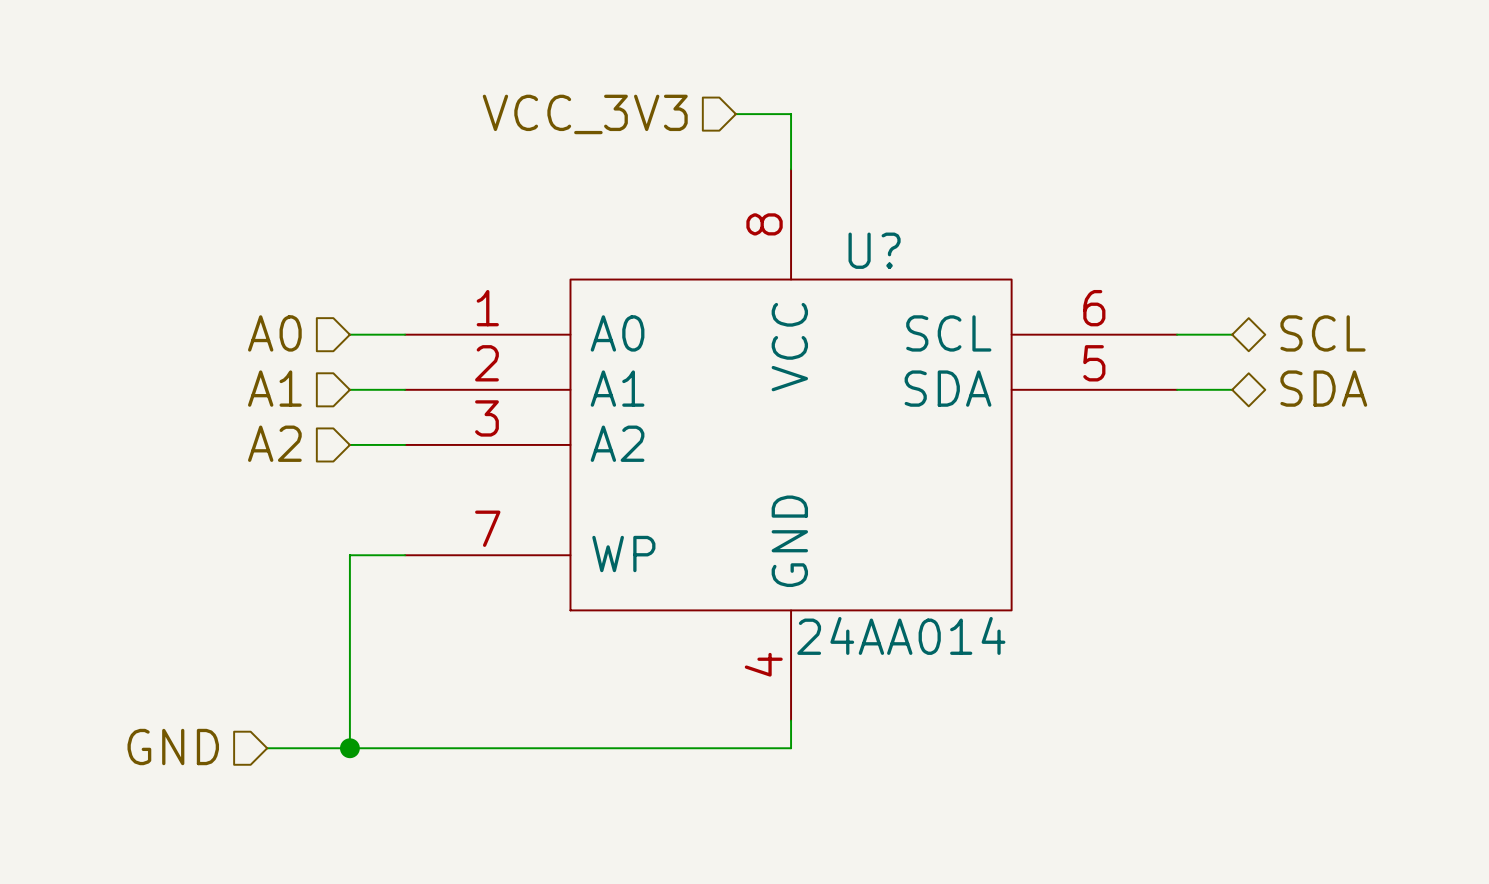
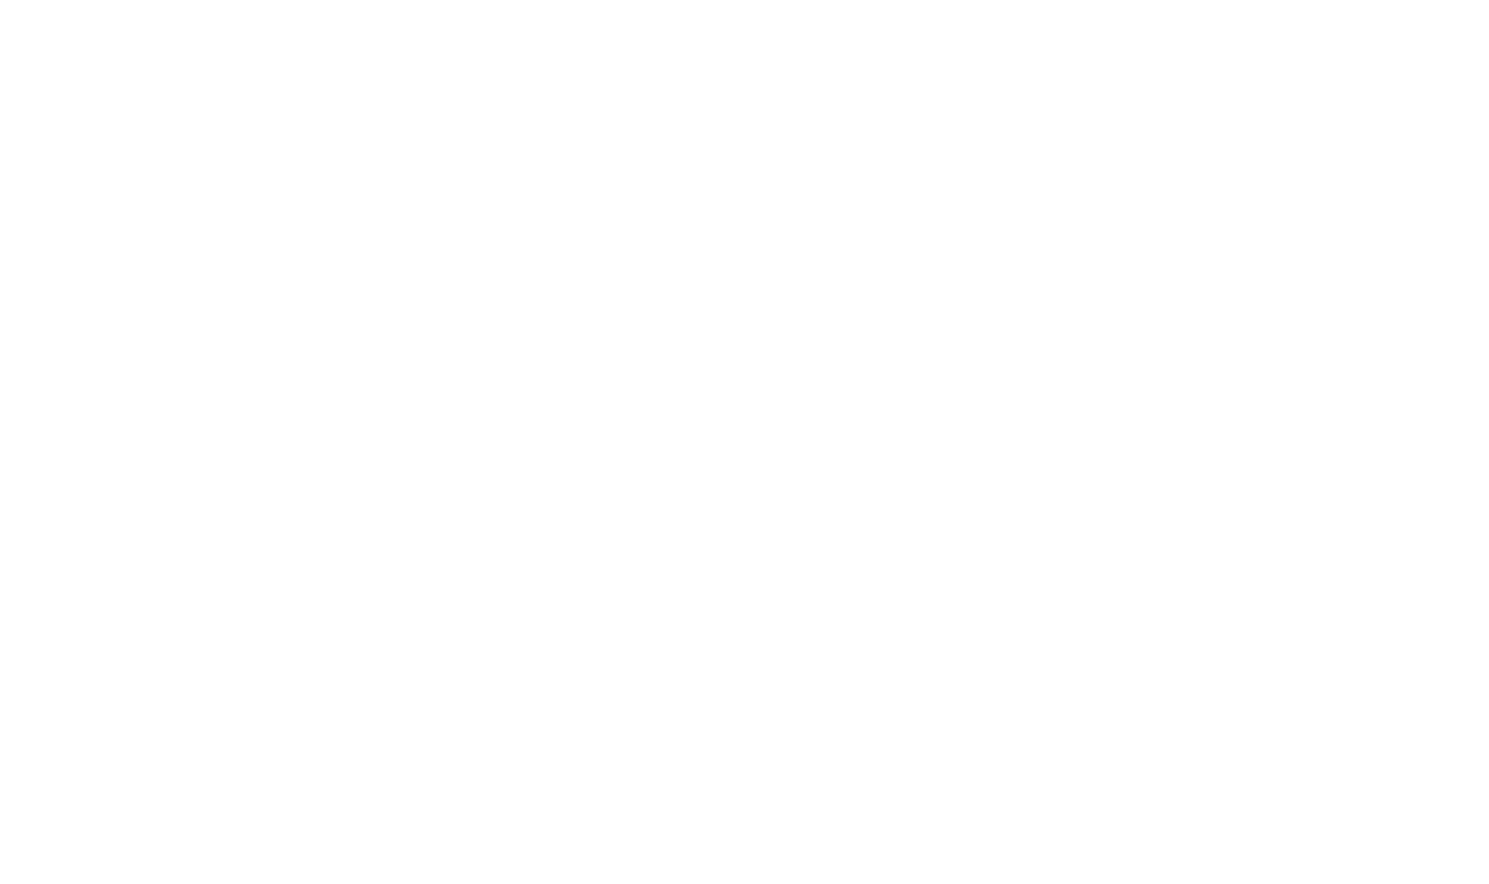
hierarchical label: VCC_3V3 (585, 114) -> none
wire: (735, 114) (791, 114) (791, 169) -> none
hierarchical label: A0 (274, 333) -> none
hierarchical label: SCL (1323, 333) -> none
wire: (349, 334) (405, 334) -> none
wire: (1177, 334) (1232, 334) -> none
hierarchical label: A1 (274, 388) -> none
hierarchical label: SDA (1323, 388) -> none
wire: (349, 389) (405, 389) -> none
wire: (1177, 389) (1232, 389) -> none
hierarchical label: A2 (274, 443) -> none
wire: (349, 444) (405, 444) -> none
U?: 24AA014 (791, 444) -> none
wire: (405, 555) (349, 555) (349, 748) -> none
wire: (791, 720) (791, 748) (267, 748) -> none
hierarchical label: GND (173, 747) -> none
junction: (349, 748) -> none

